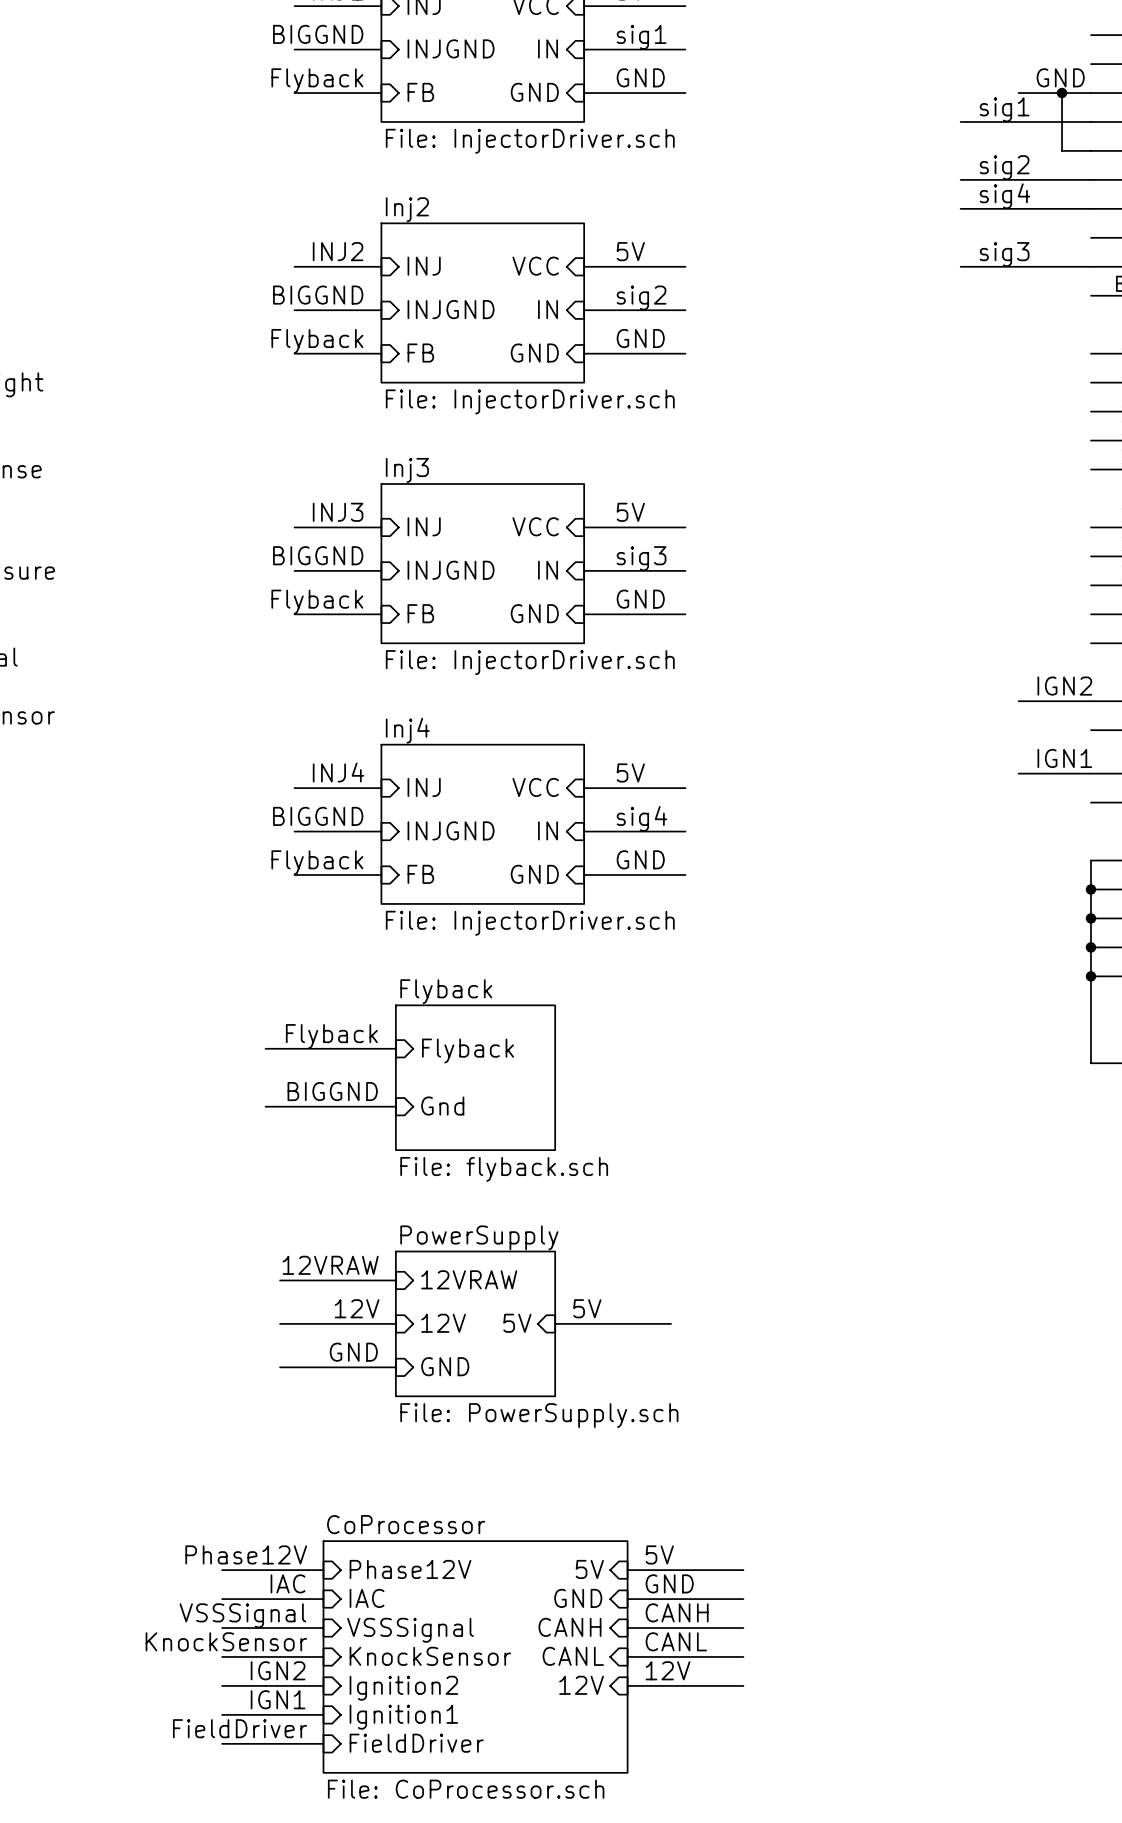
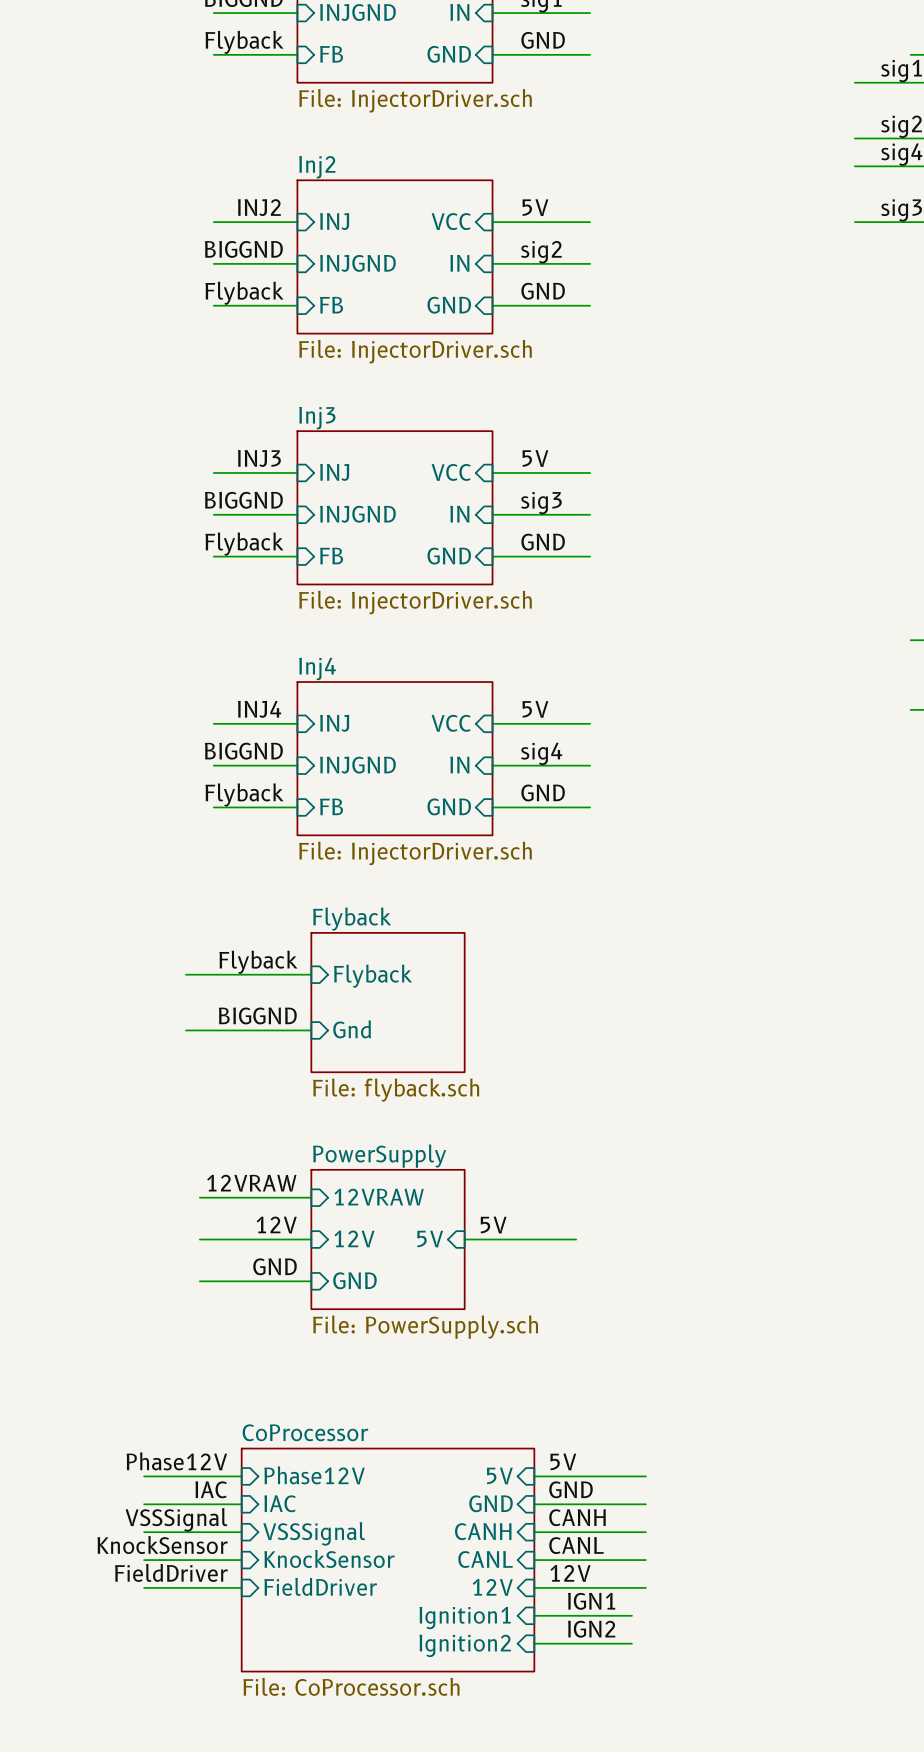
label: IGN2 (278, 1670) -> FieldDriver (171, 1572)
sheet pin: Ignition2 (403, 1688) -> FieldDriver (320, 1586)
label: IGN1 (278, 1699) -> none
label: none -> IGN1 (591, 1601)
wire: (222, 1714) (323, 1714) -> none
wire: none -> (534, 1615) (631, 1615)
sheet pin rotation: 0° (403, 1717) -> 180° (465, 1618)
label: FieldDriver (240, 1728) -> none
label: none -> IGN2 (591, 1629)
wire: (222, 1743) (323, 1743) -> none
sheet pin: FieldDriver (416, 1743) -> none
wire: none -> (534, 1643) (631, 1643)
sheet pin: none -> Ignition2 (465, 1645)

